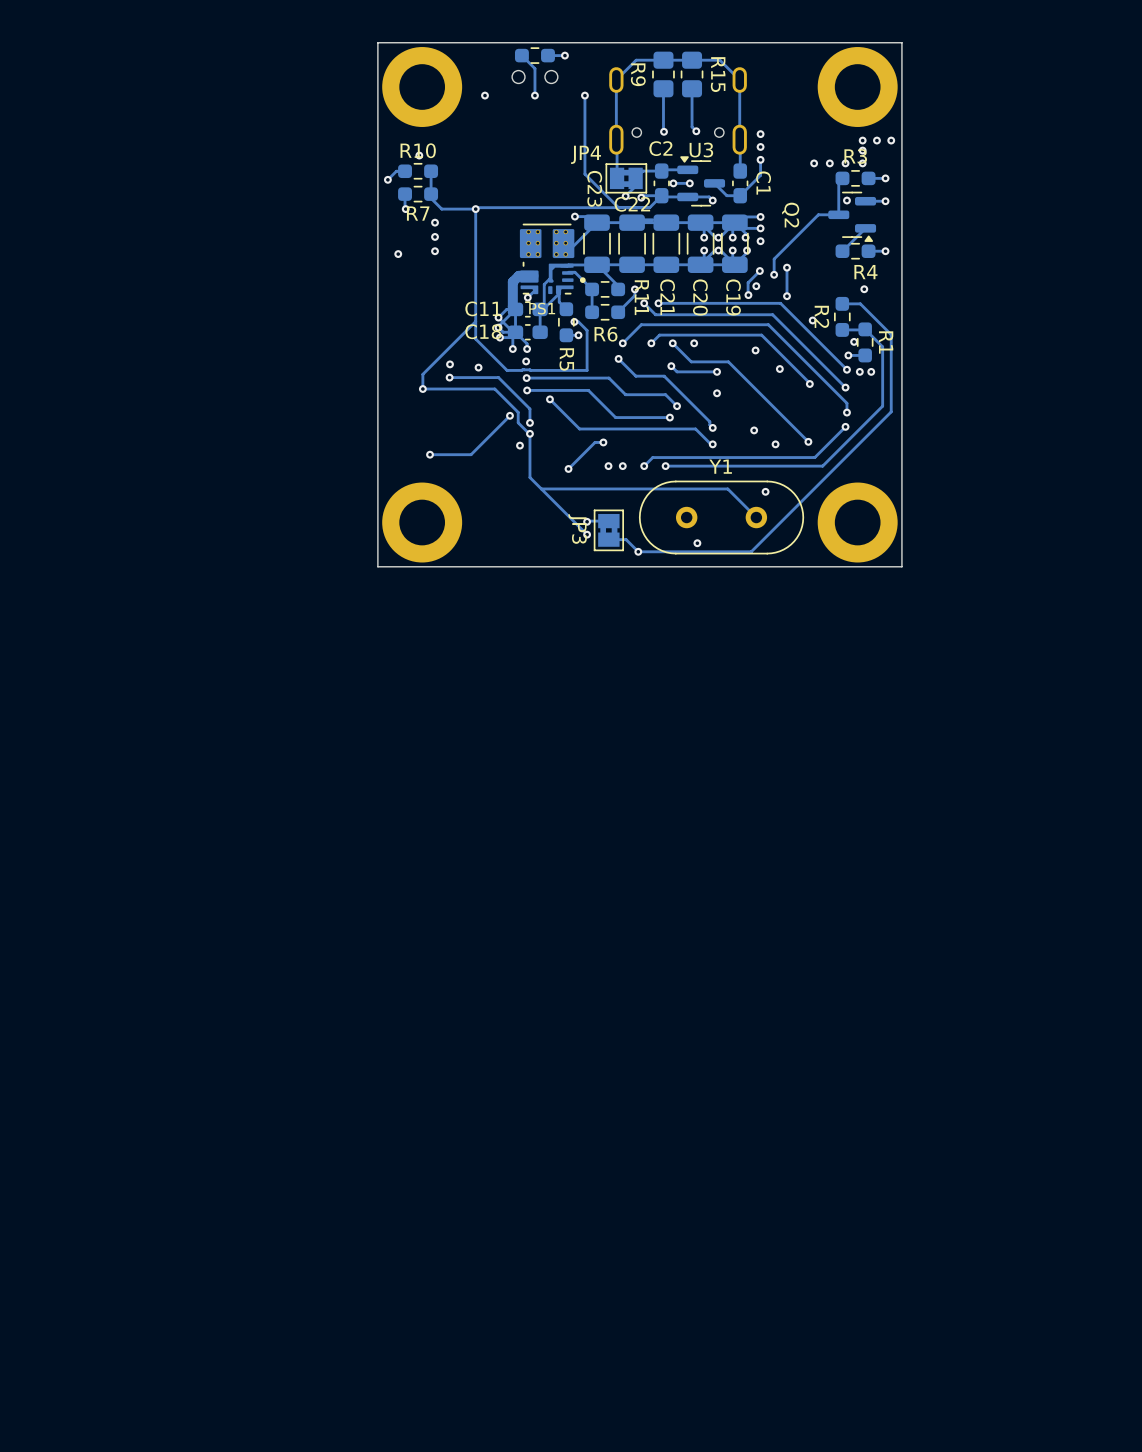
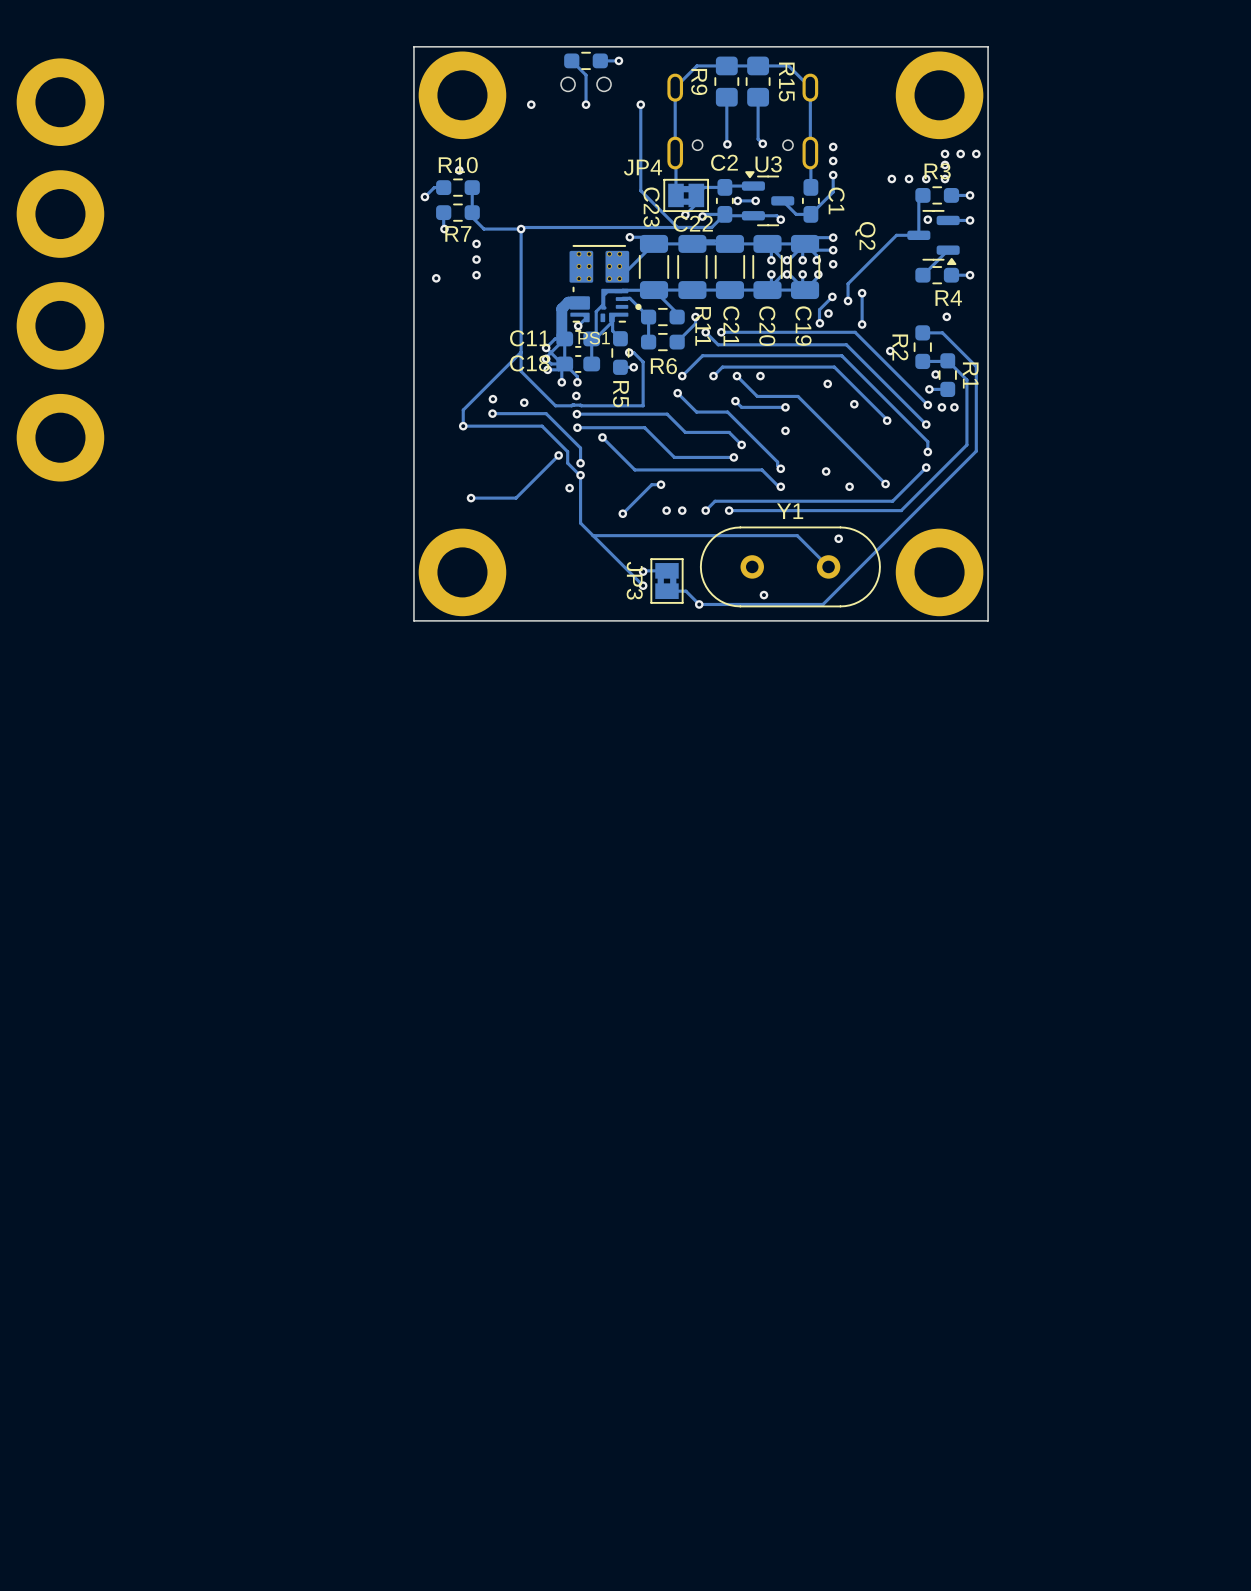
part: none -> (60, 102)
part: none -> (60, 214)
part: none -> (60, 325)
part: none -> (60, 437)

